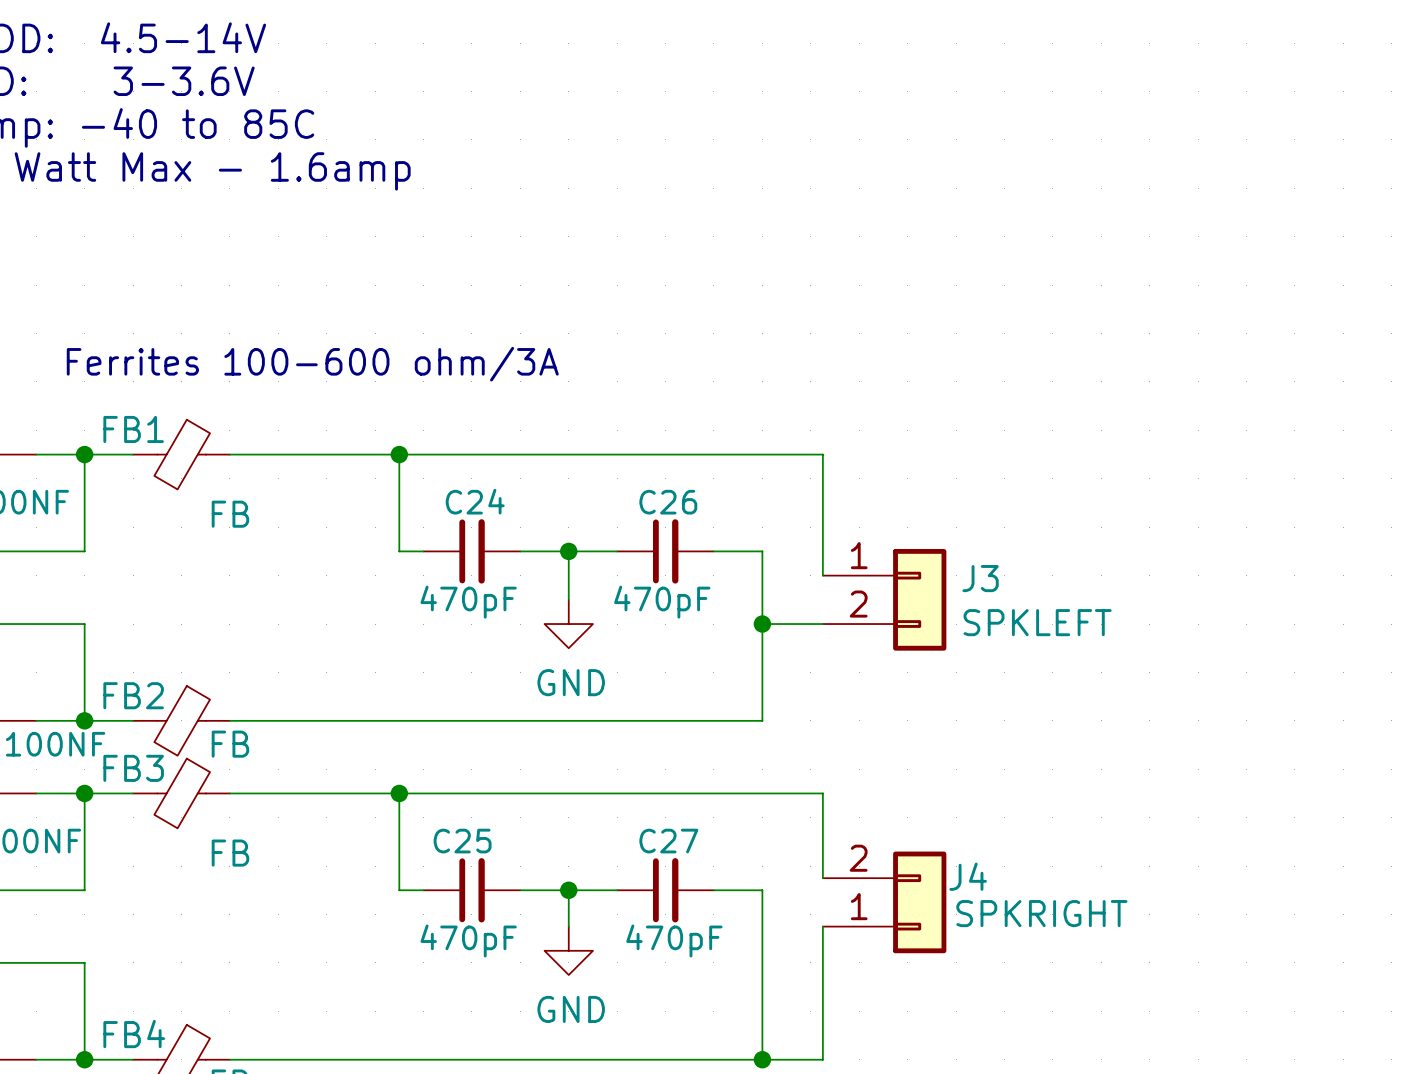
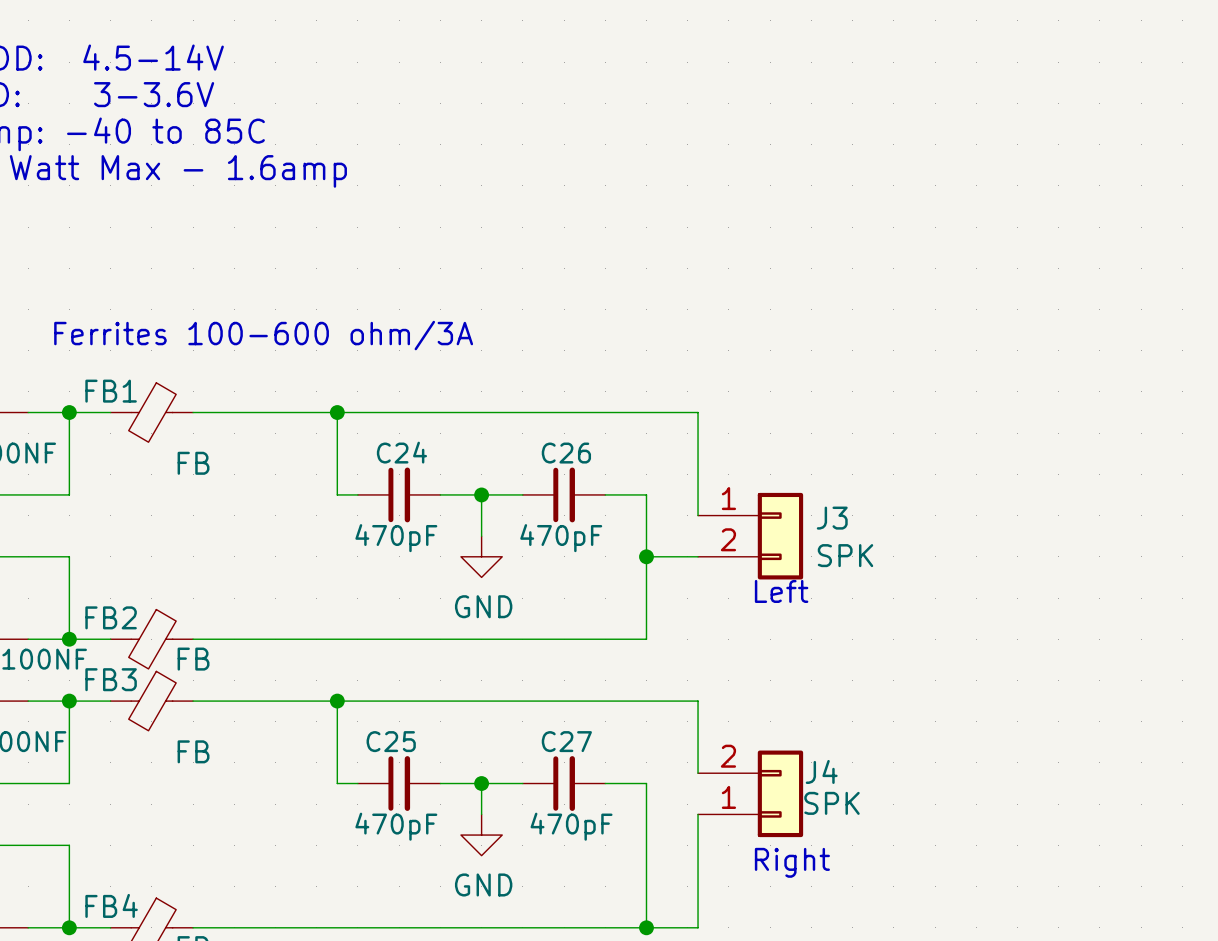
J3 value: SPKLEFT (1037, 622) -> SPK (845, 555)
text: none -> Left (781, 591)
J4 value: SPKRIGHT (1041, 913) -> SPK (831, 803)
text: none -> Right (792, 862)

